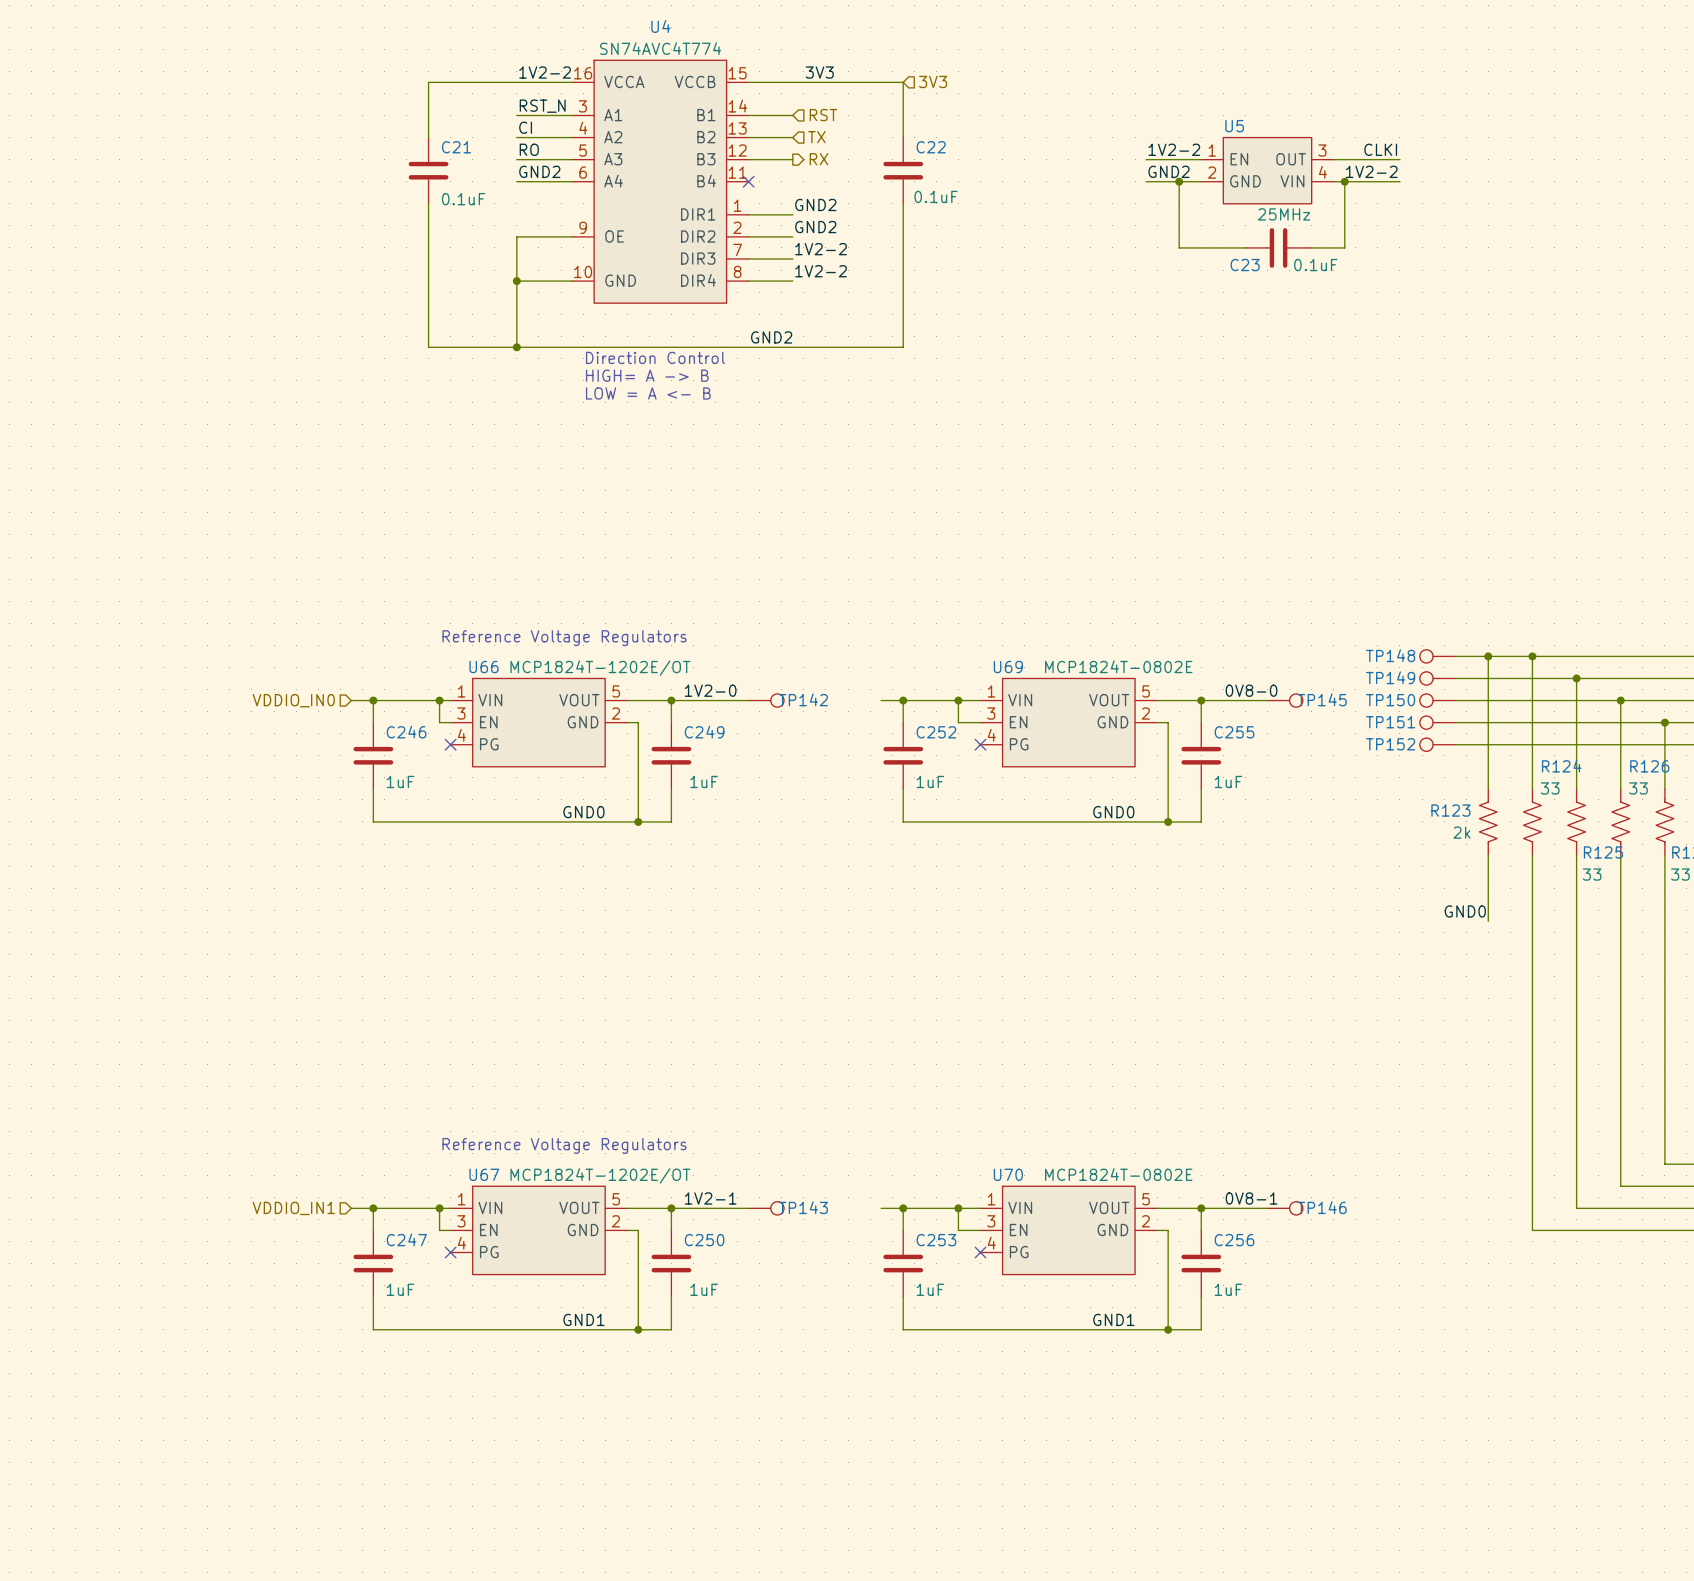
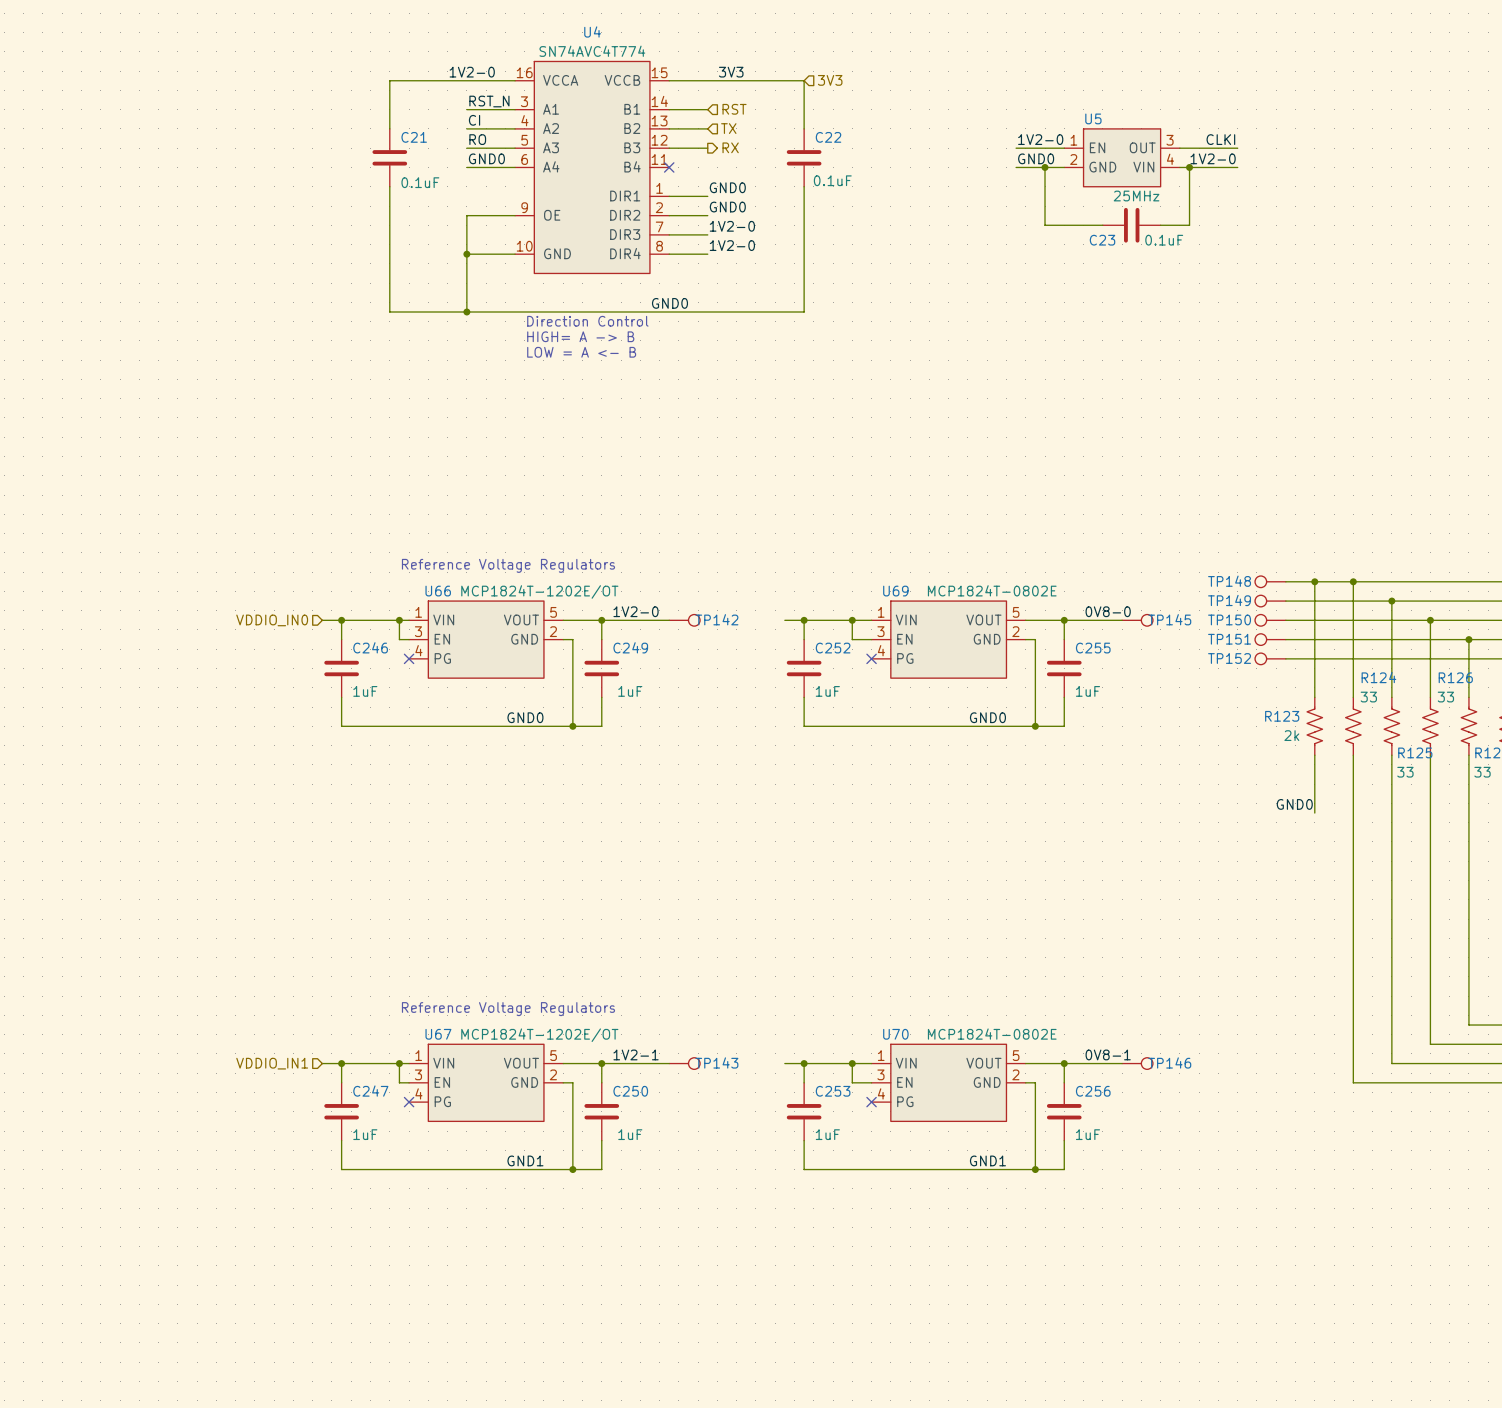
label: 1V2-2 (545, 72) -> 1V2-0 (472, 72)
label: 1V2-2 (1174, 149) -> 1V2-0 (1040, 139)
label: GND2 (539, 171) -> GND0 (486, 158)
label: GND2 (1169, 171) -> GND0 (1036, 158)
label: 1V2-2 (1371, 171) -> 1V2-0 (1213, 158)
label: GND2 (815, 204) -> GND0 (727, 187)
label: GND2 (815, 227) -> GND0 (727, 207)
label: 1V2-2 (821, 249) -> 1V2-0 (732, 226)
label: 1V2-2 (821, 271) -> 1V2-0 (732, 245)
label: GND2 (771, 337) -> GND0 (669, 303)

